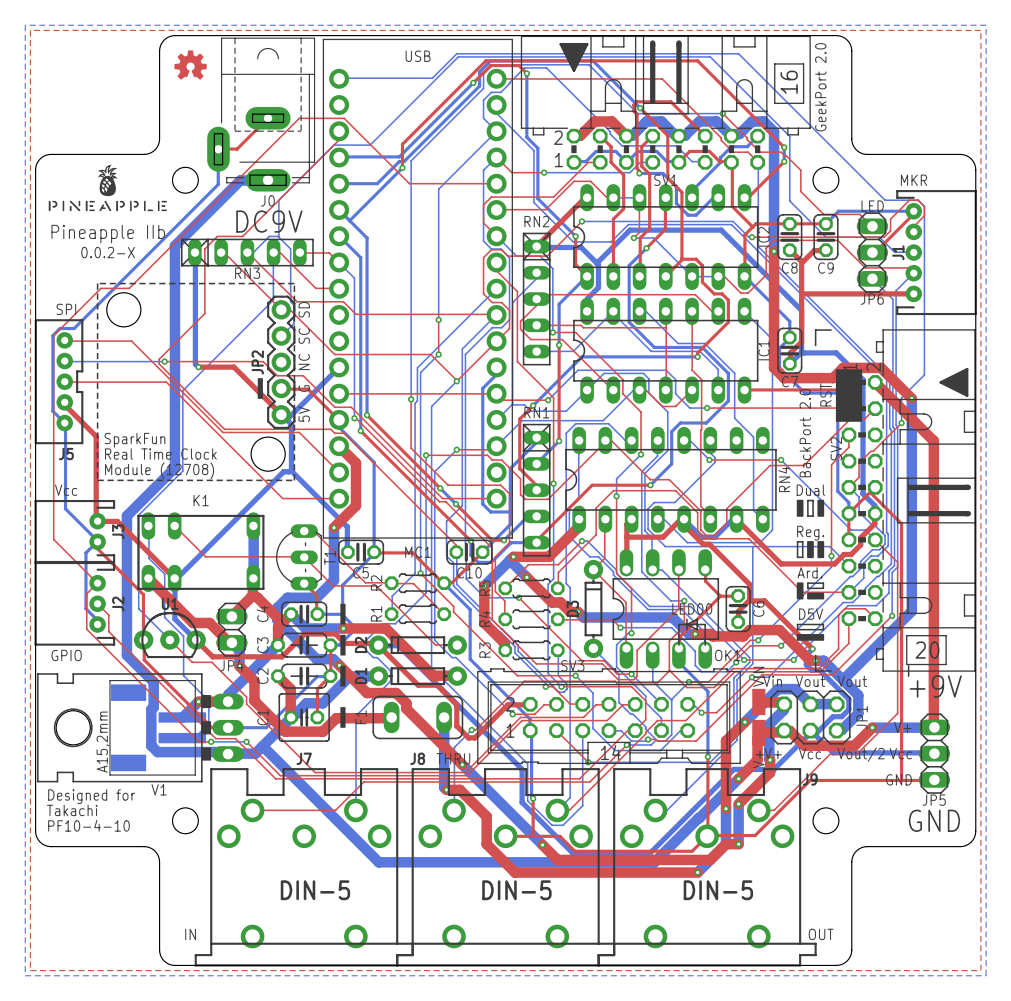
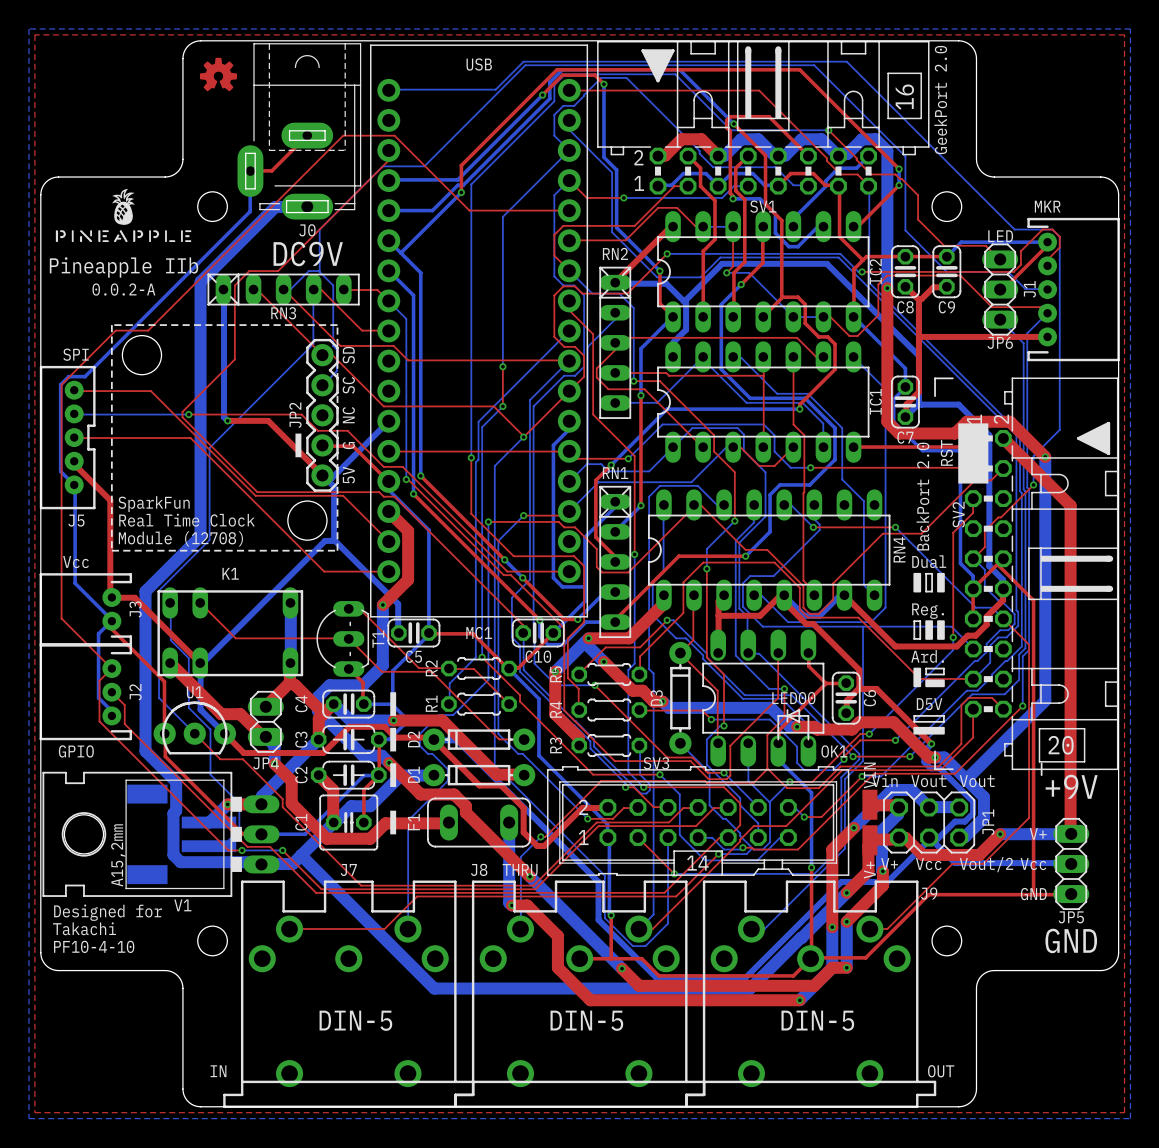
text: 0.0.2-X (108, 252) -> 0.0.2-A (123, 289)

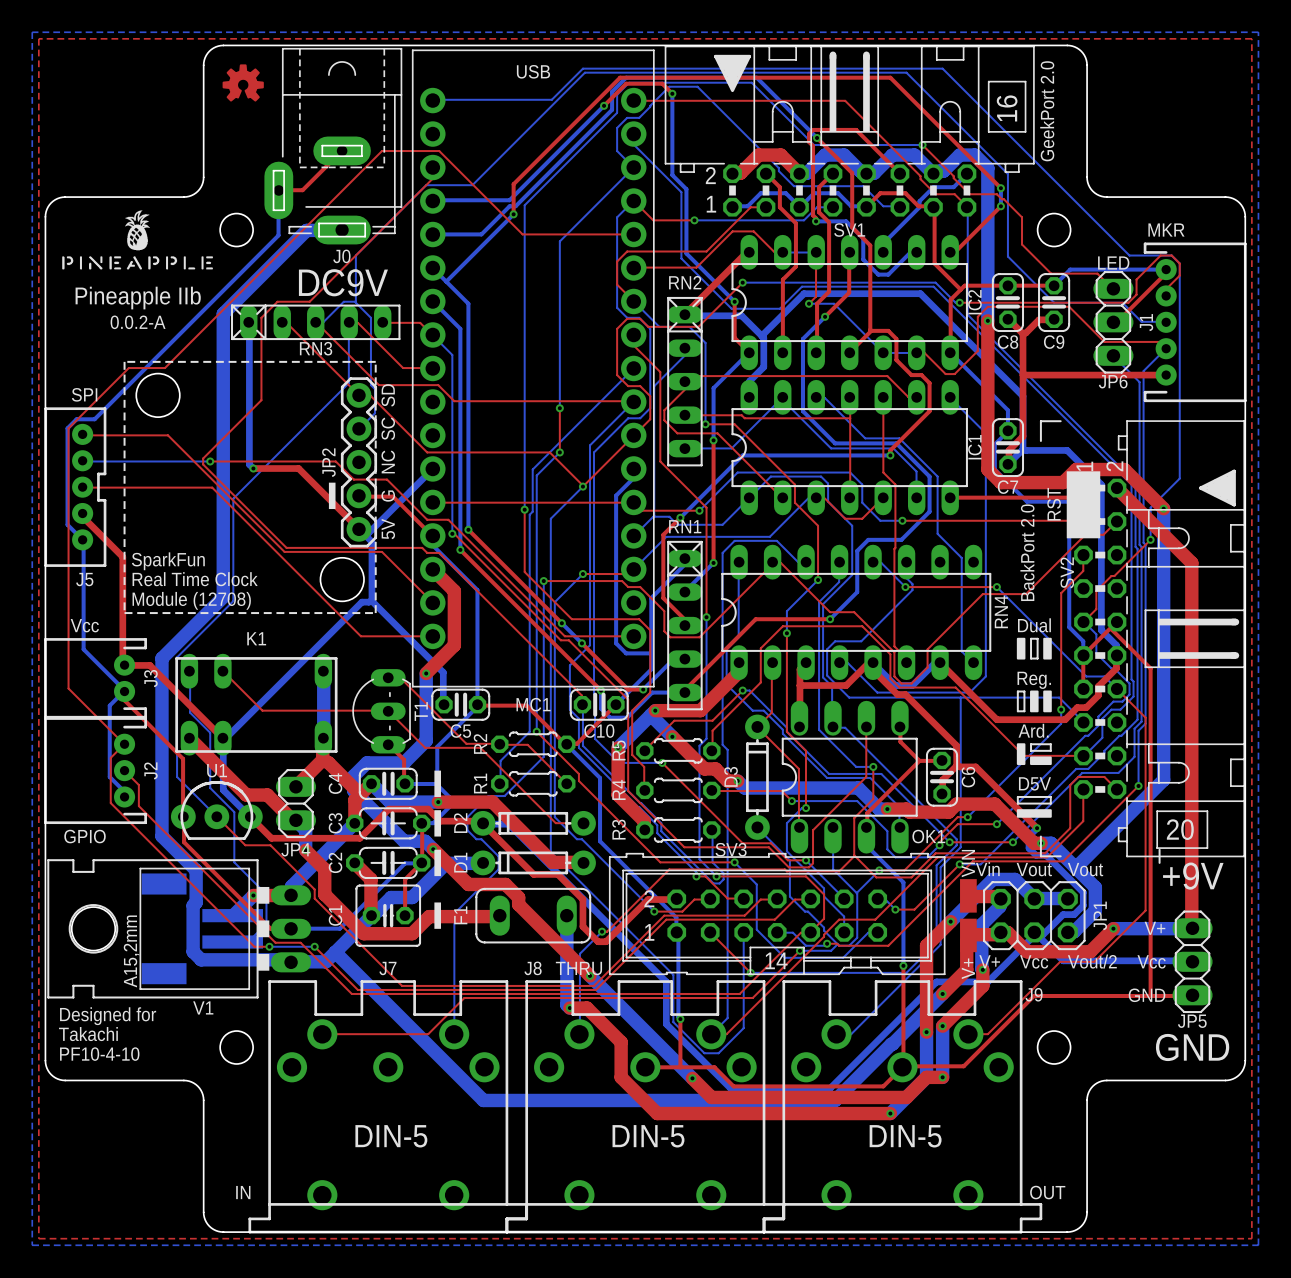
text: LED00 (793, 698) -> none
line: (787, 710) (787, 721) -> none
line: (799, 710) (787, 715) (799, 721) (799, 710) -> none
line: (778, 739) (778, 715) (808, 715) (808, 739) -> none

